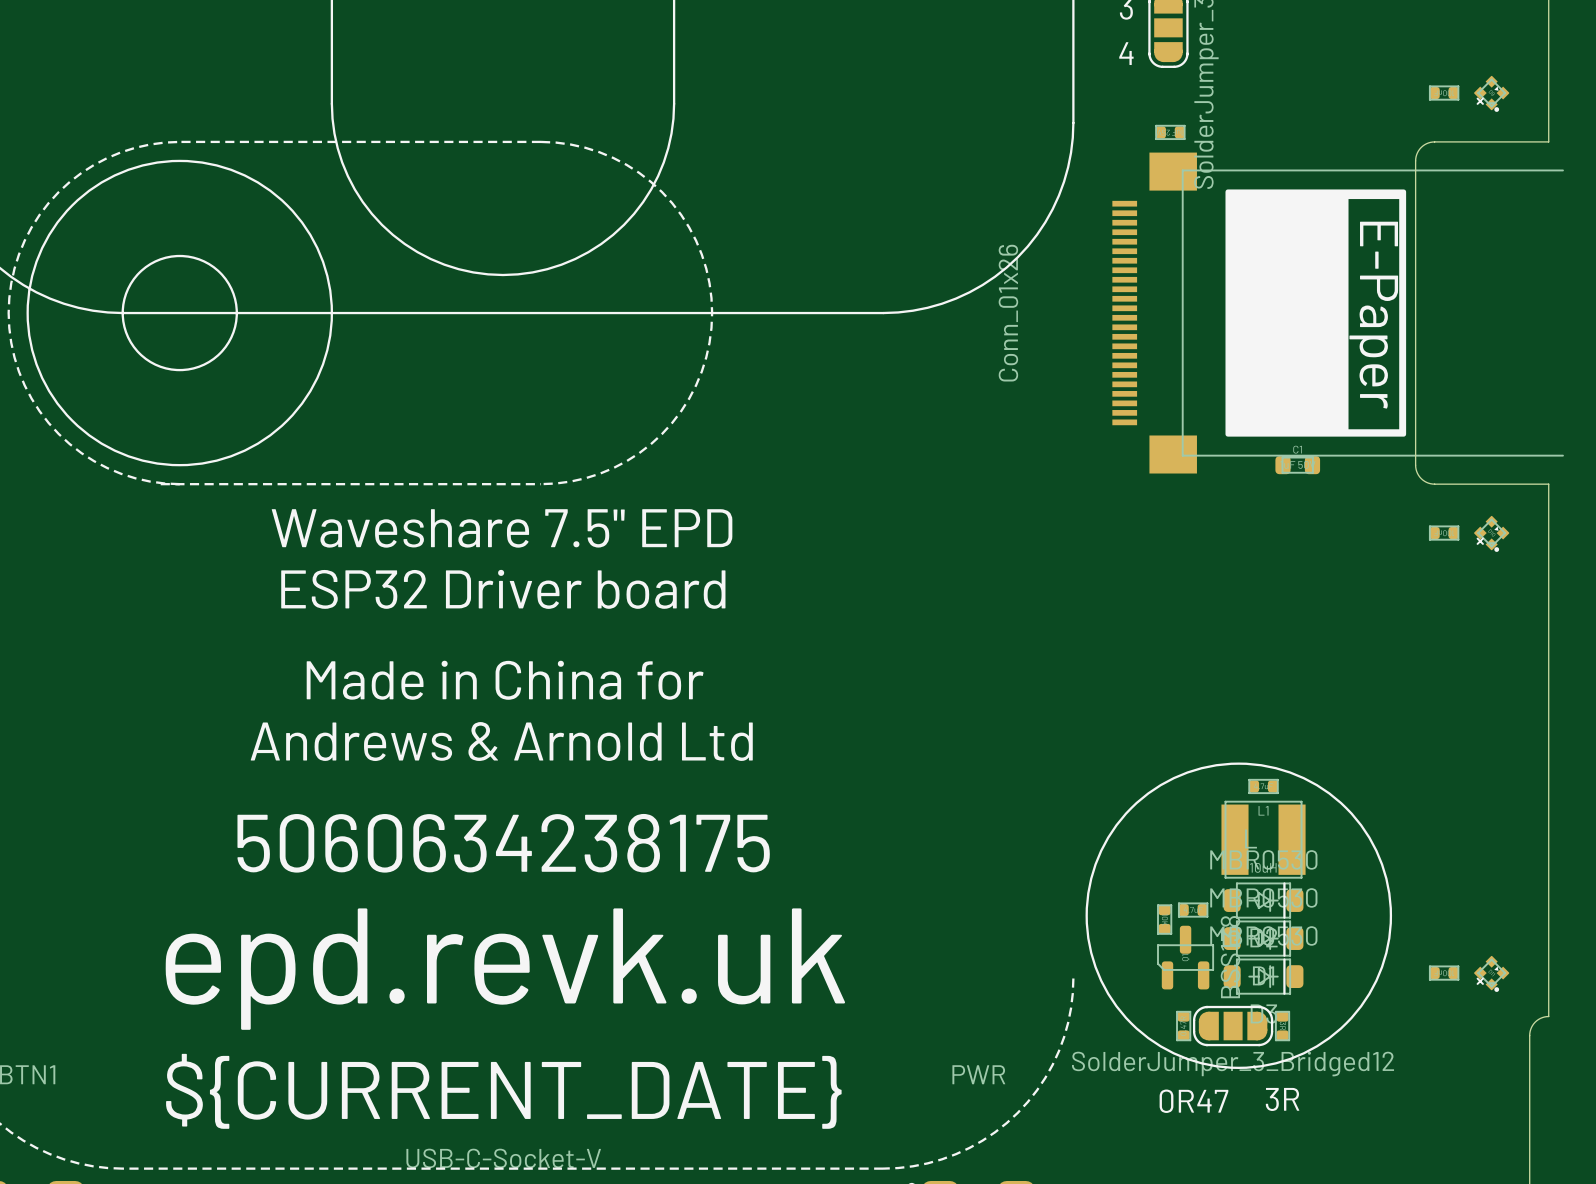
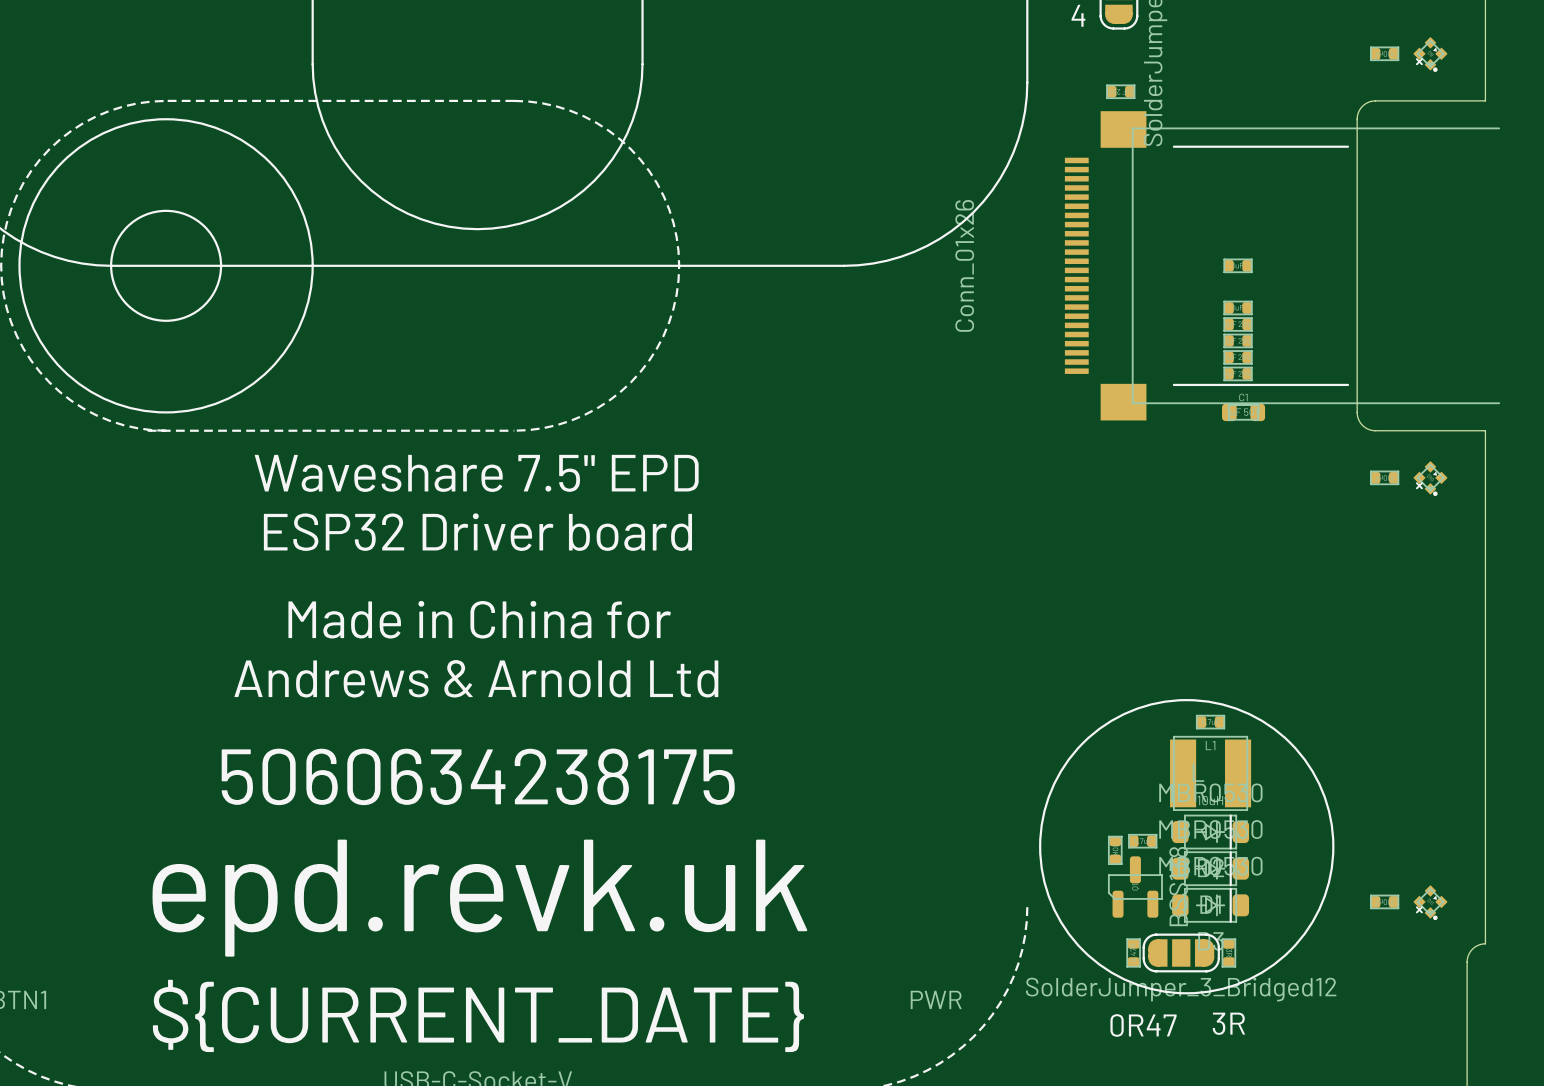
line: none -> (1173, 146) (1348, 146)
drawing: [1225, 189, 1407, 437] -> none
text: E-Paper (1373, 315) -> none
line: none -> (1173, 384) (1348, 384)

